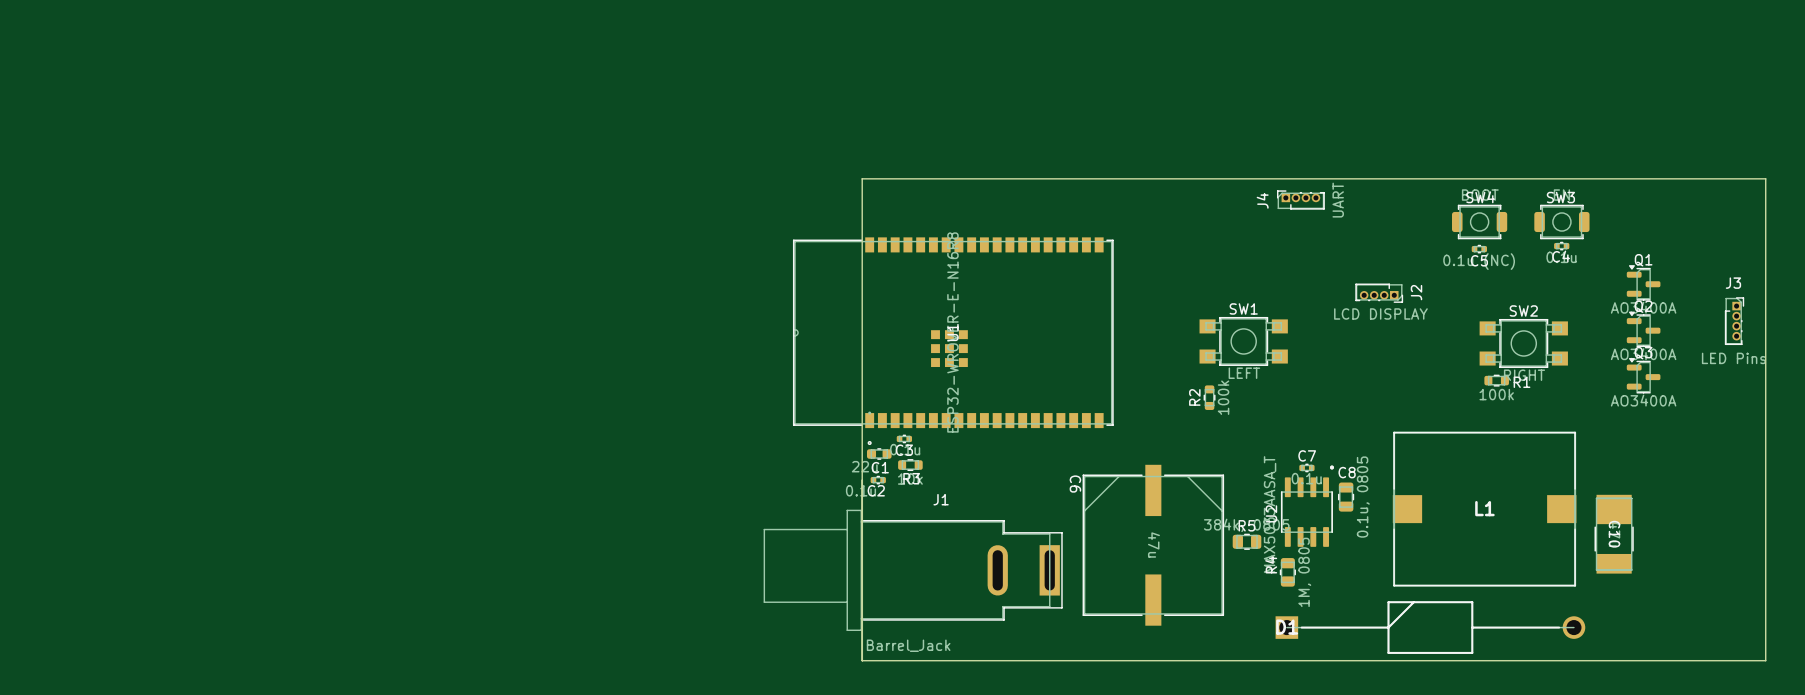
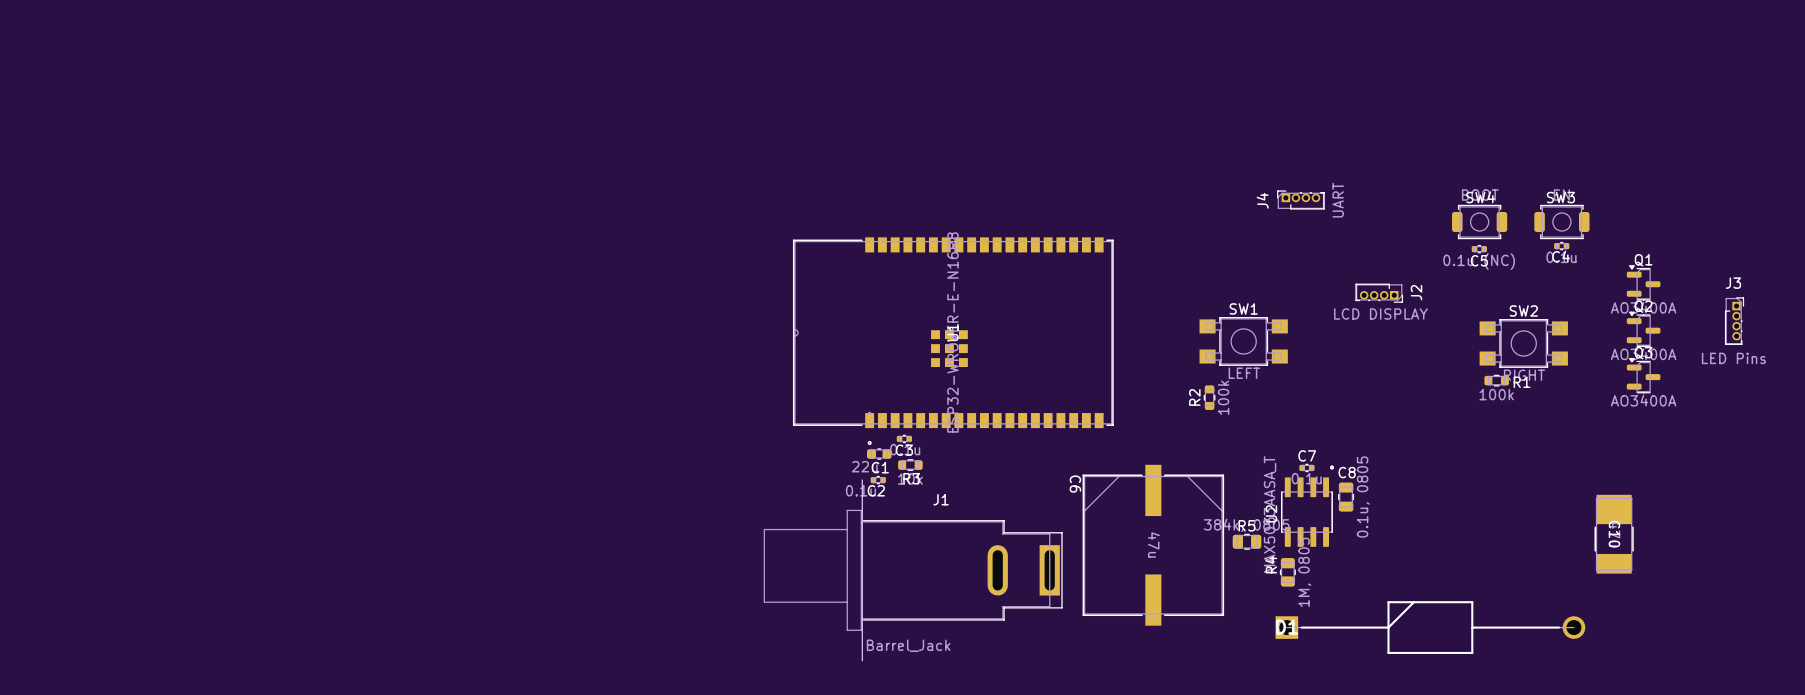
board edge: (862, 178) (1765, 178) (1765, 660) (862, 660) (862, 178) -> none
L1: (1484, 509) -> none

